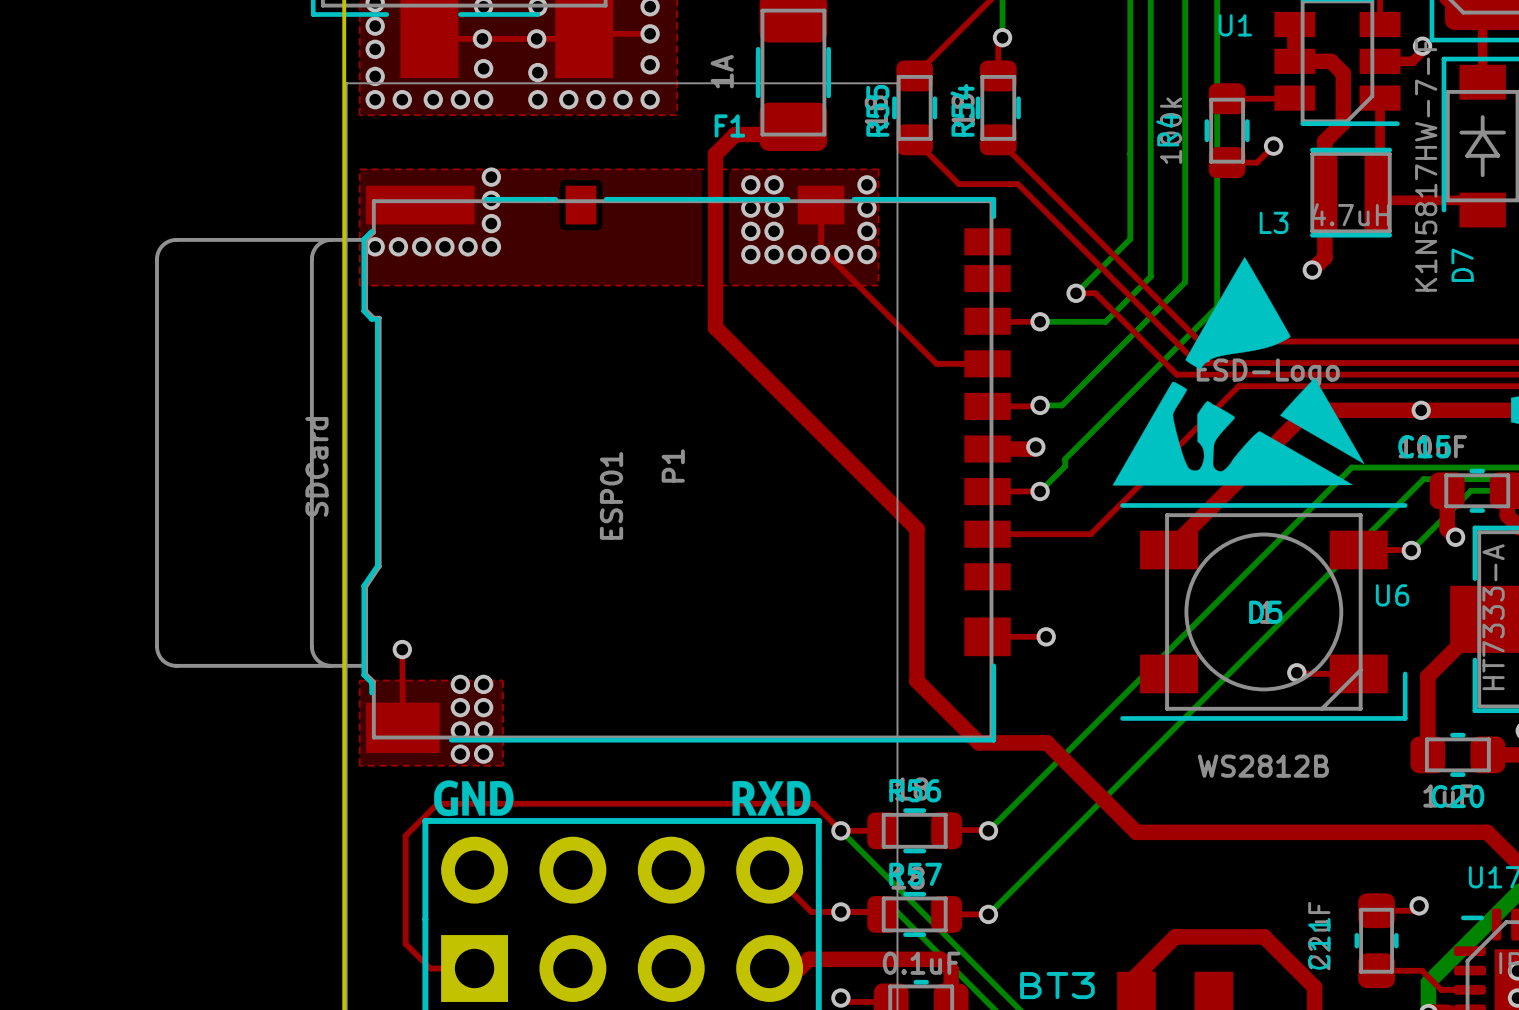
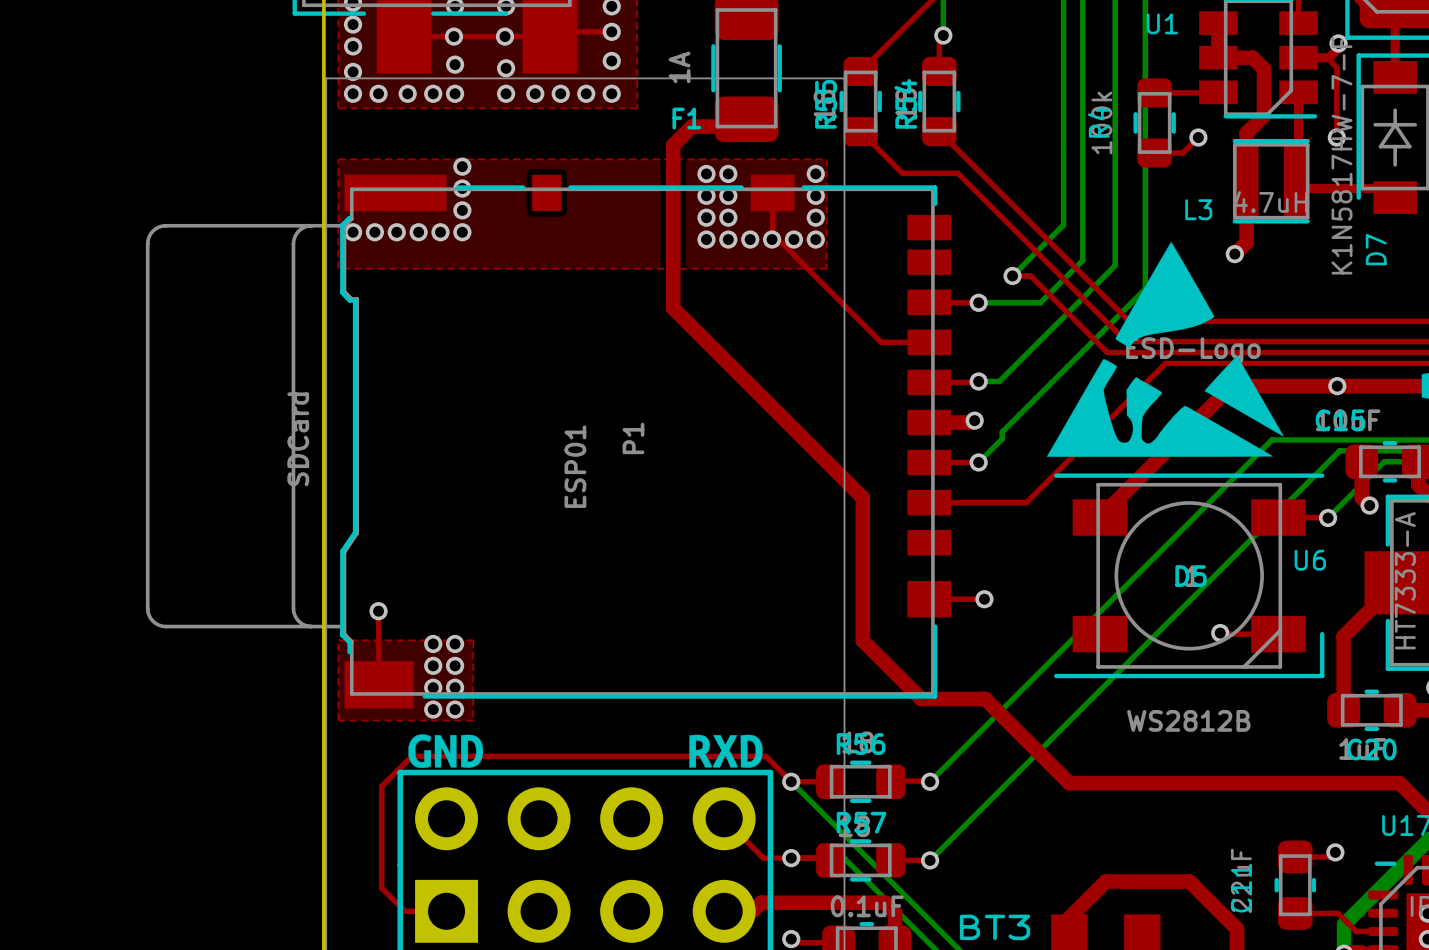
top track: none -> (1327, 57) (1336, 67) (1336, 137)
via: none -> (1336, 137)

